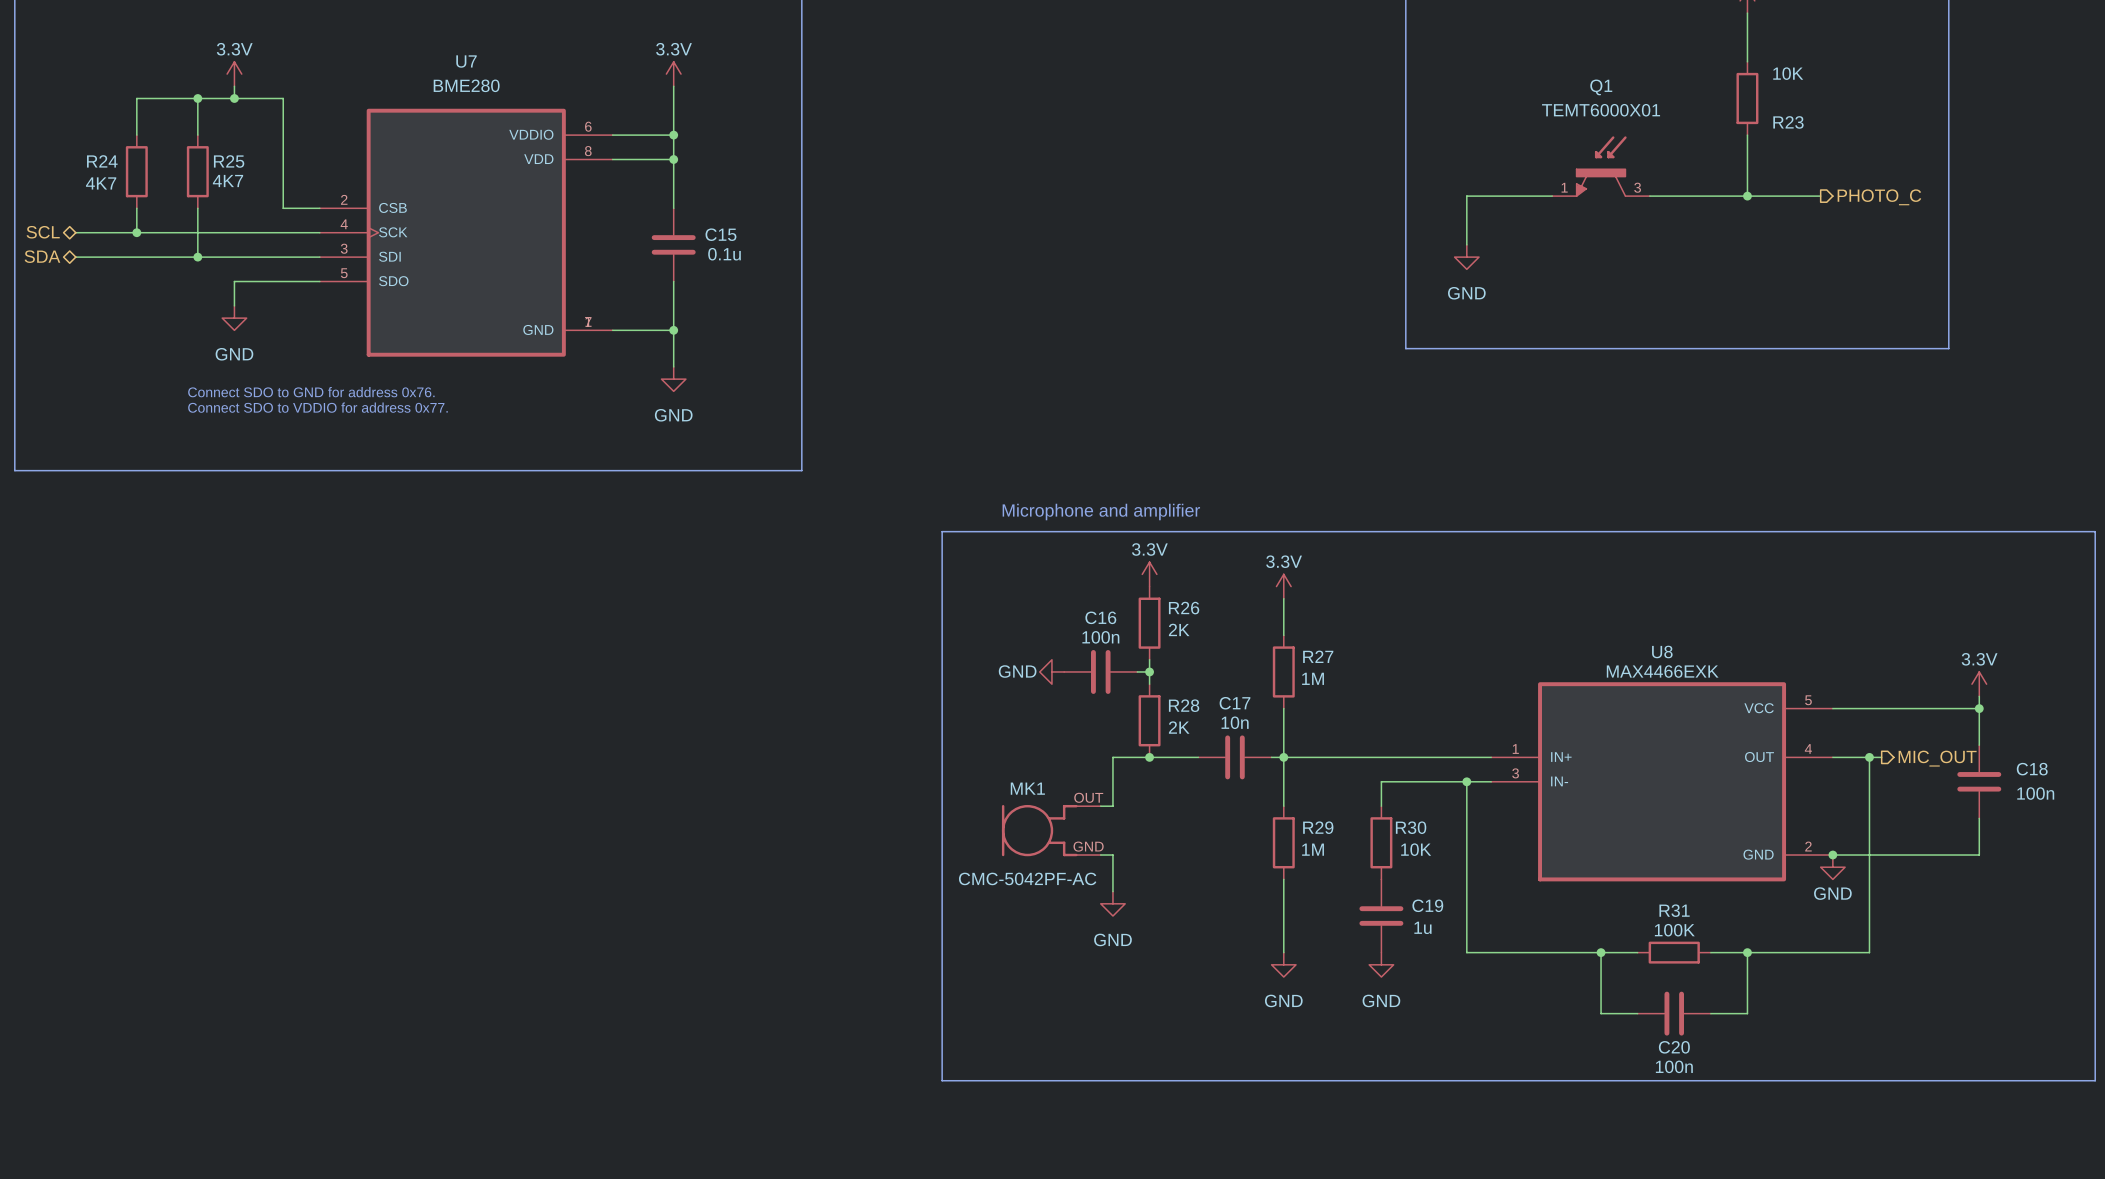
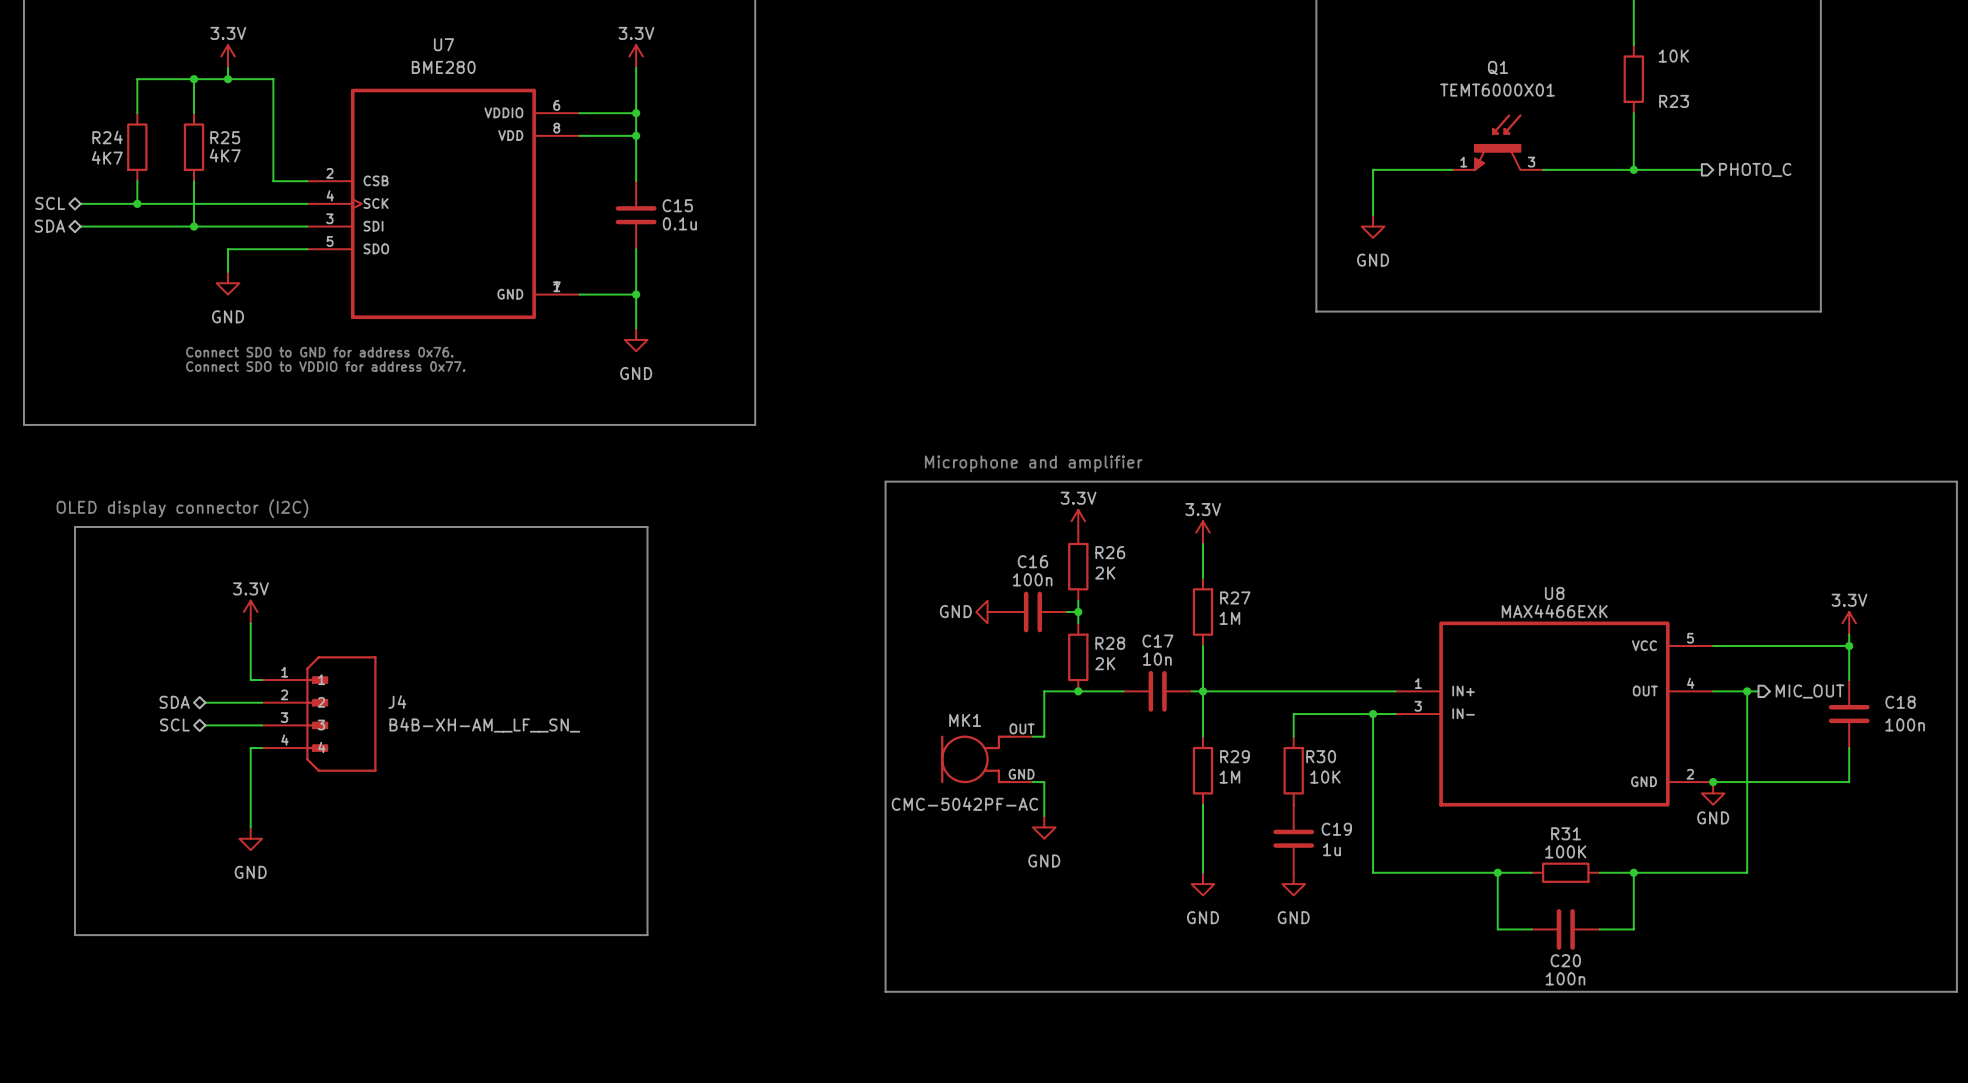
text: none -> OLED display connector (I2C) (182, 508)
line: none -> (74, 526) (647, 526) (647, 935) (74, 935) (74, 526)
power symbol: none -> 3.3V (250, 612)
wire: none -> (250, 623) (250, 680) (262, 680)
hierarchical label: none -> SDA (174, 702)
wire: none -> (205, 702) (262, 702)
J4: none -> B4B-XH-AM__LF__SN_ (319, 714)
hierarchical label: none -> SCL (174, 724)
wire: none -> (205, 725) (262, 725)
wire: none -> (262, 748) (250, 748) (250, 827)
power symbol: none -> GND (250, 838)

